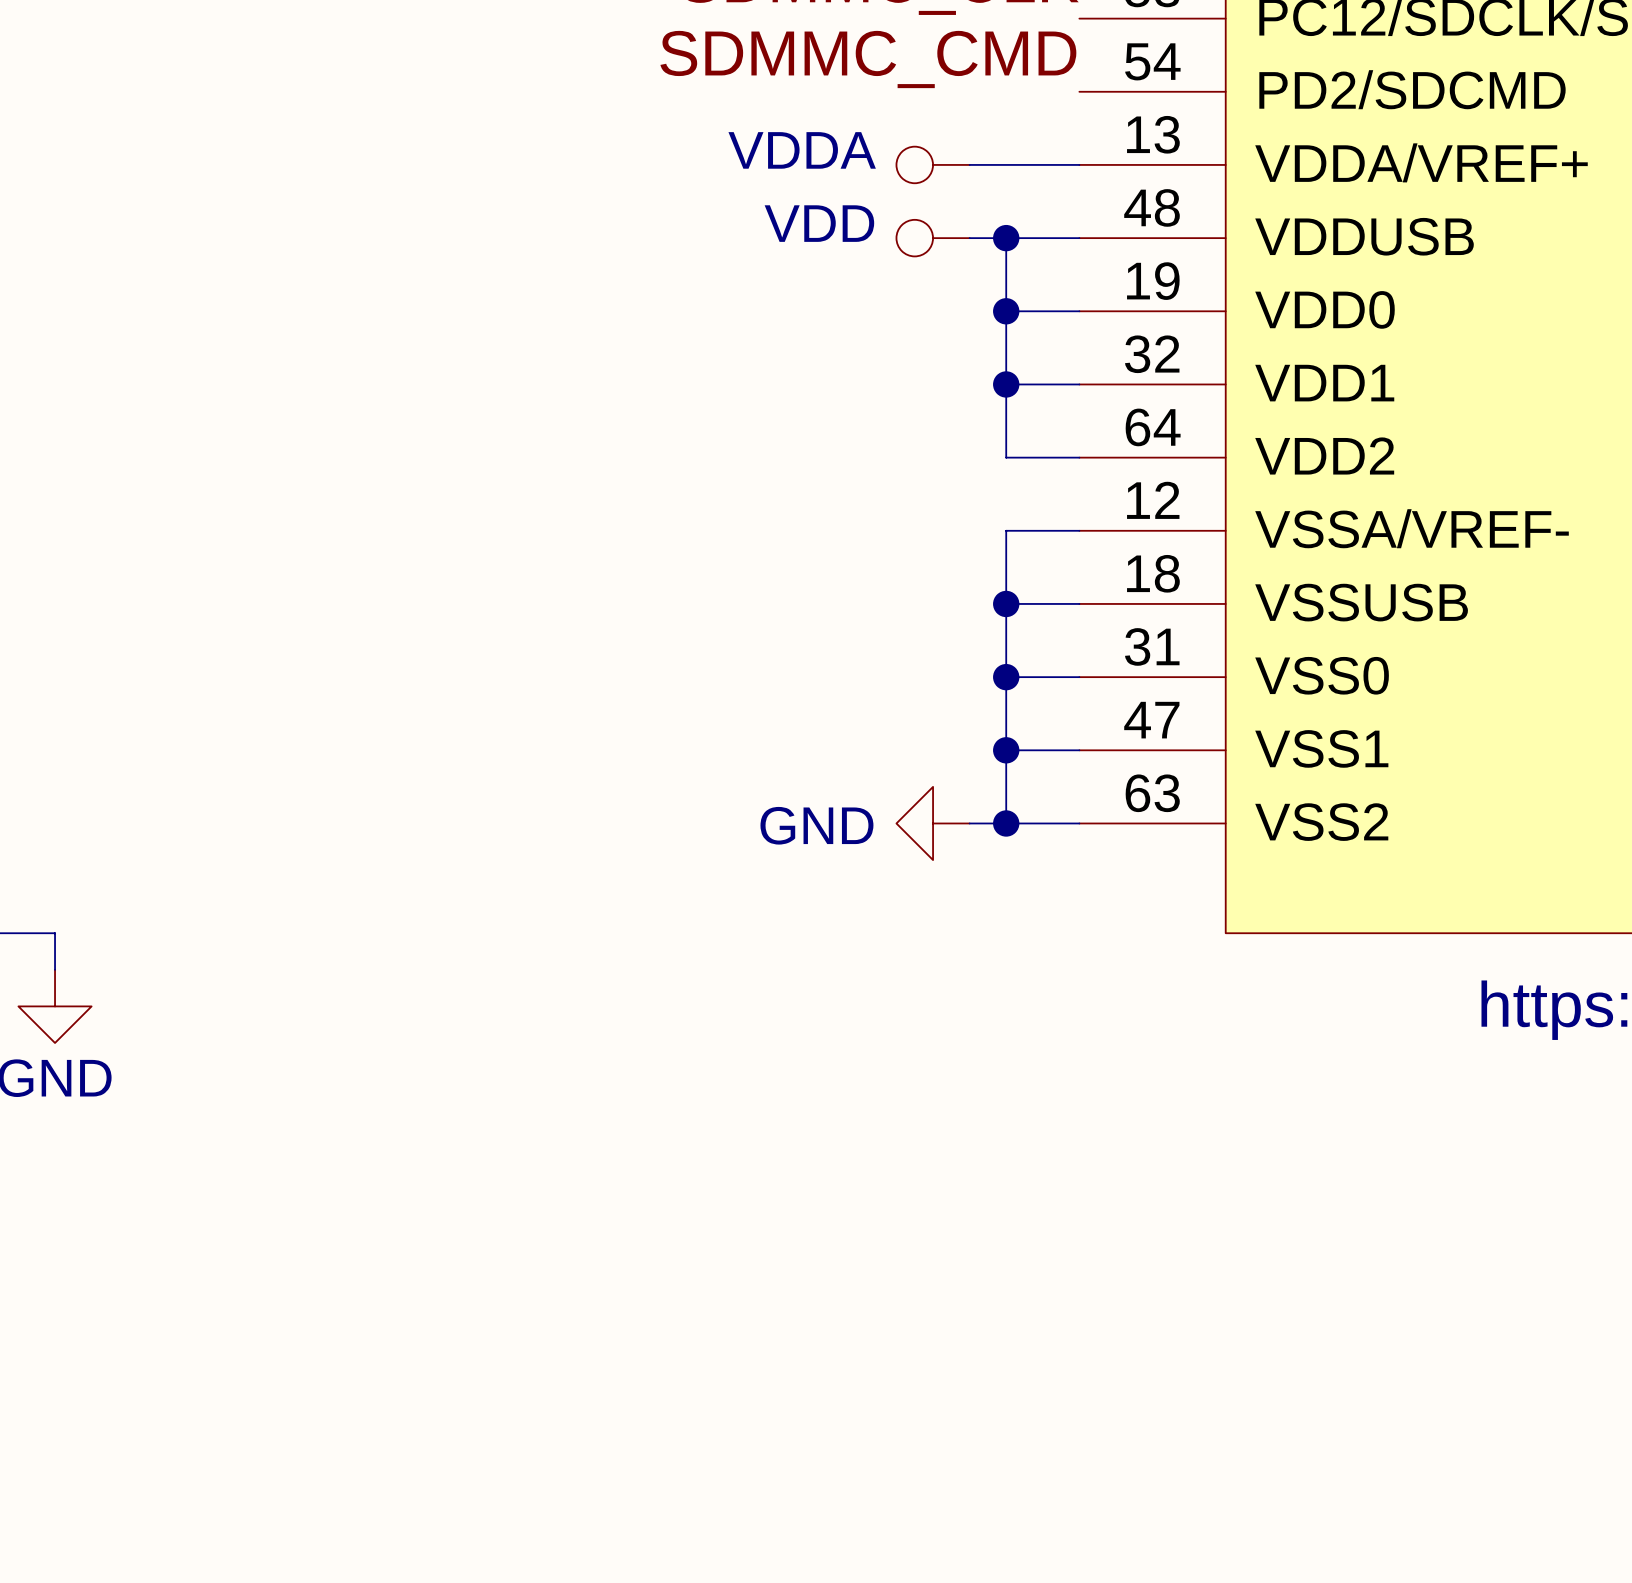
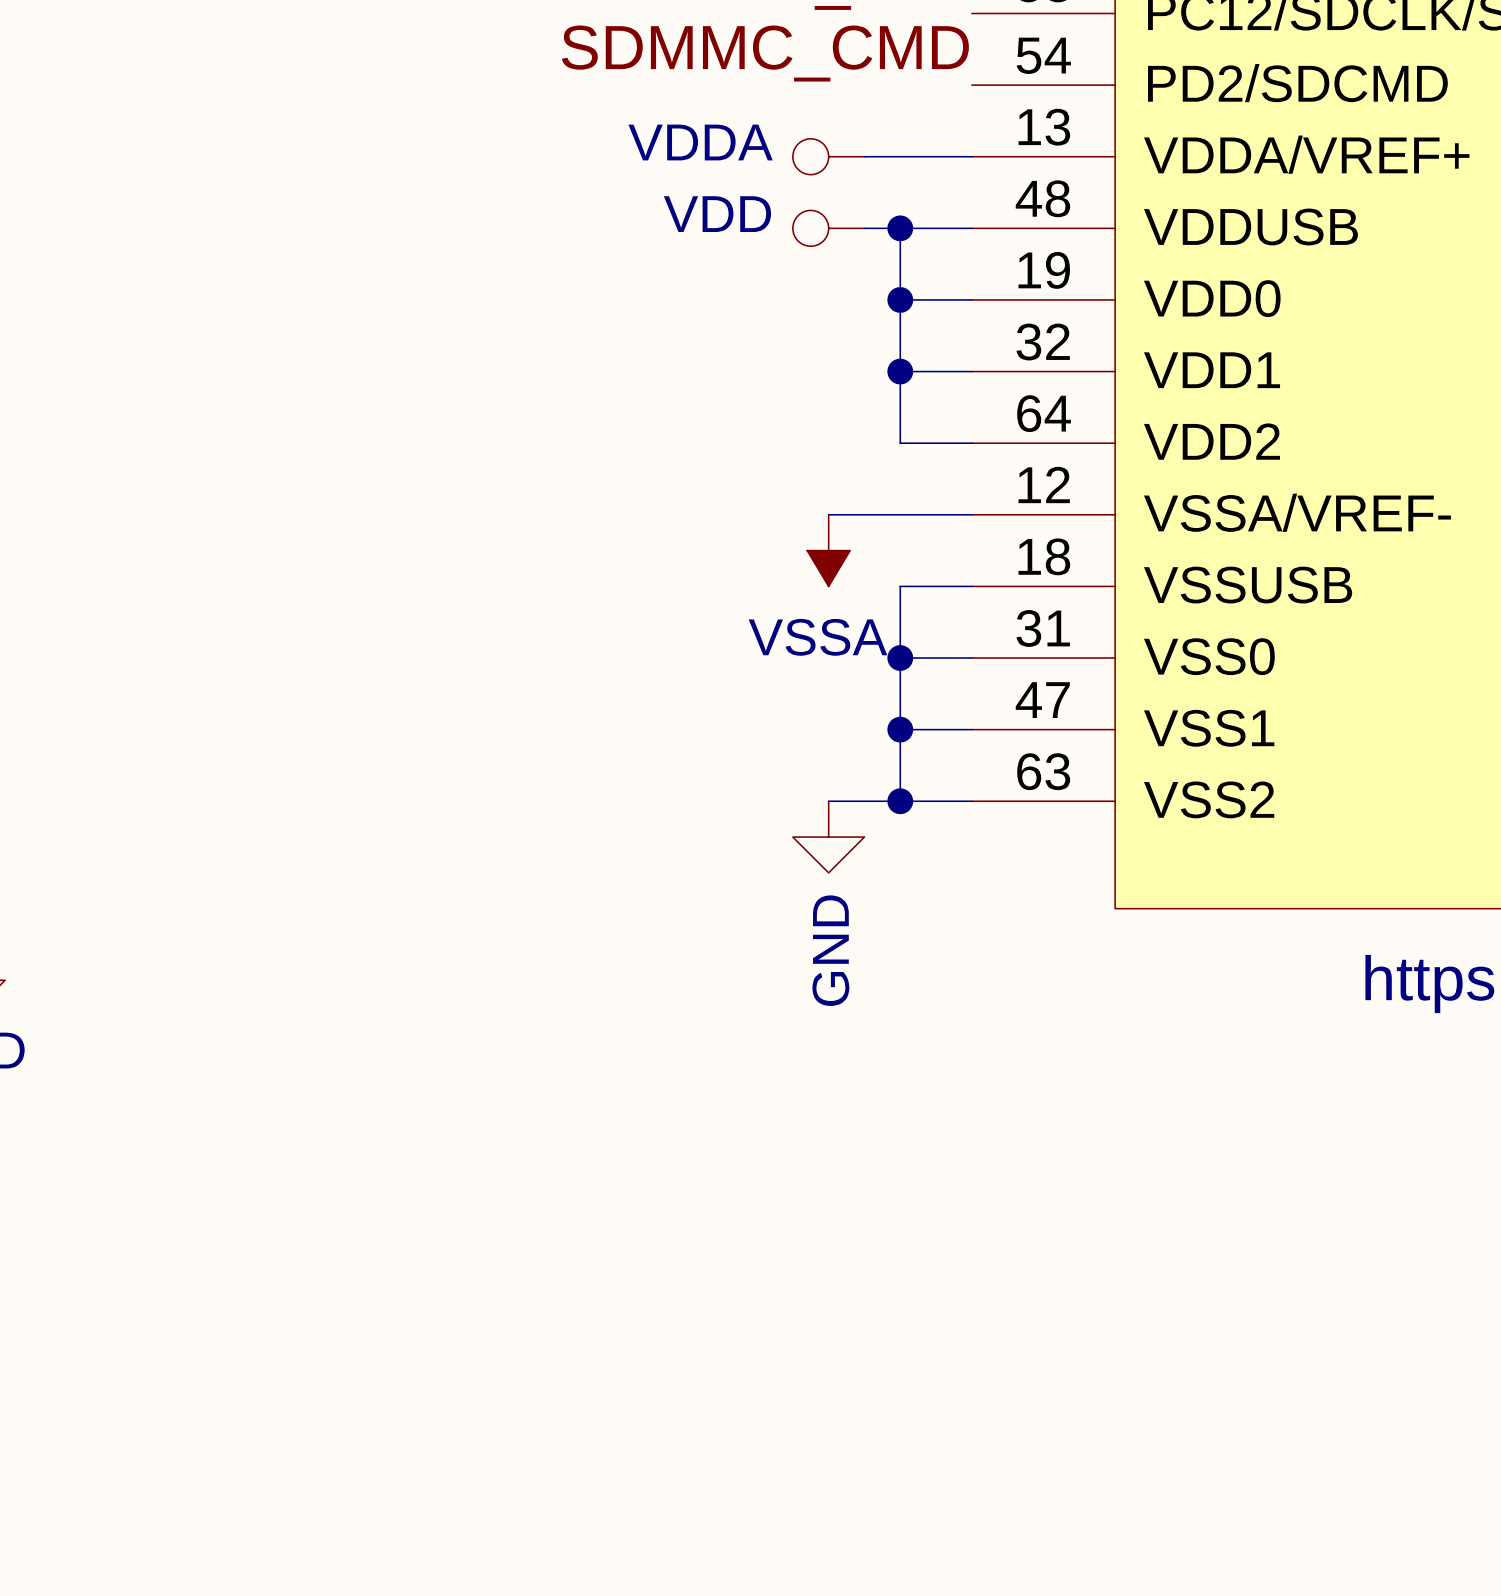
wire: (1006, 530) (1006, 603) -> (900, 514) (828, 514)
power symbol: none -> VSSA (828, 550)
junction: (1006, 603) -> none
power symbol rotation: 0° (933, 823) -> 90° counterclockwise (828, 837)

